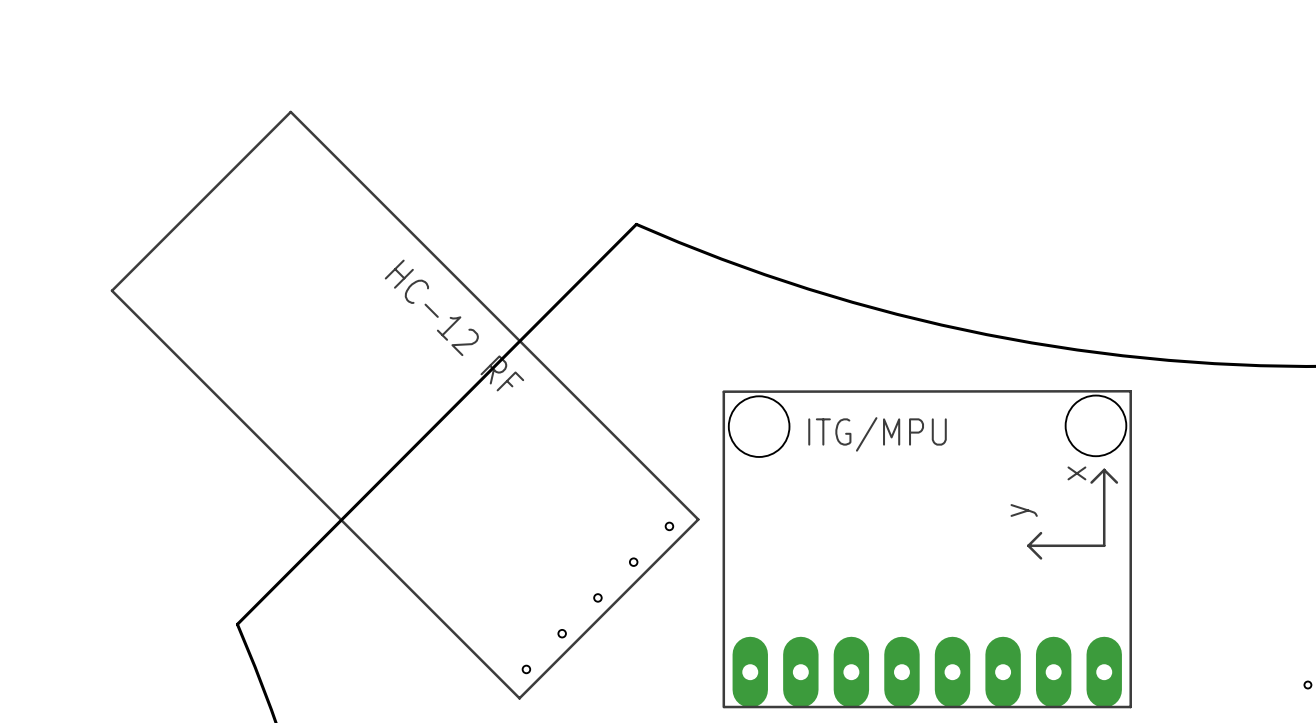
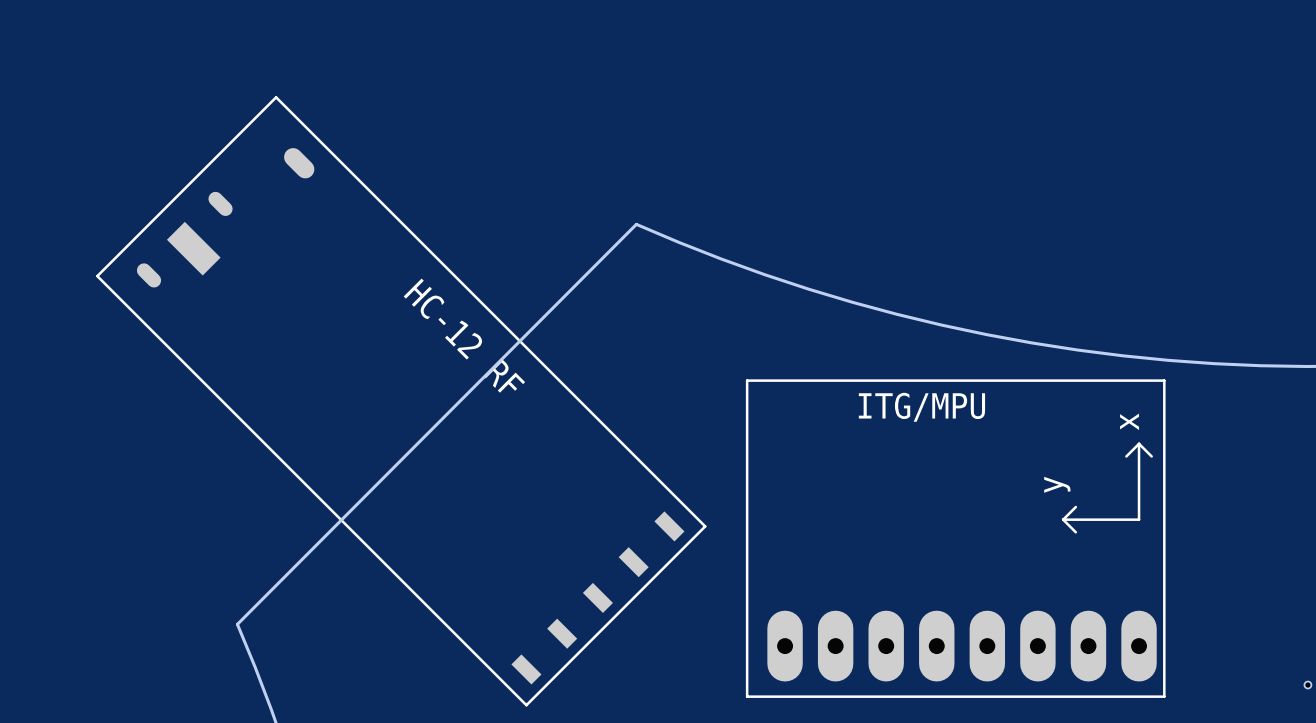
part footprint: [110, 110, 700, 700] -> [96, 96, 707, 707]
part: none -> (955, 538)
part: (927, 549) -> none

